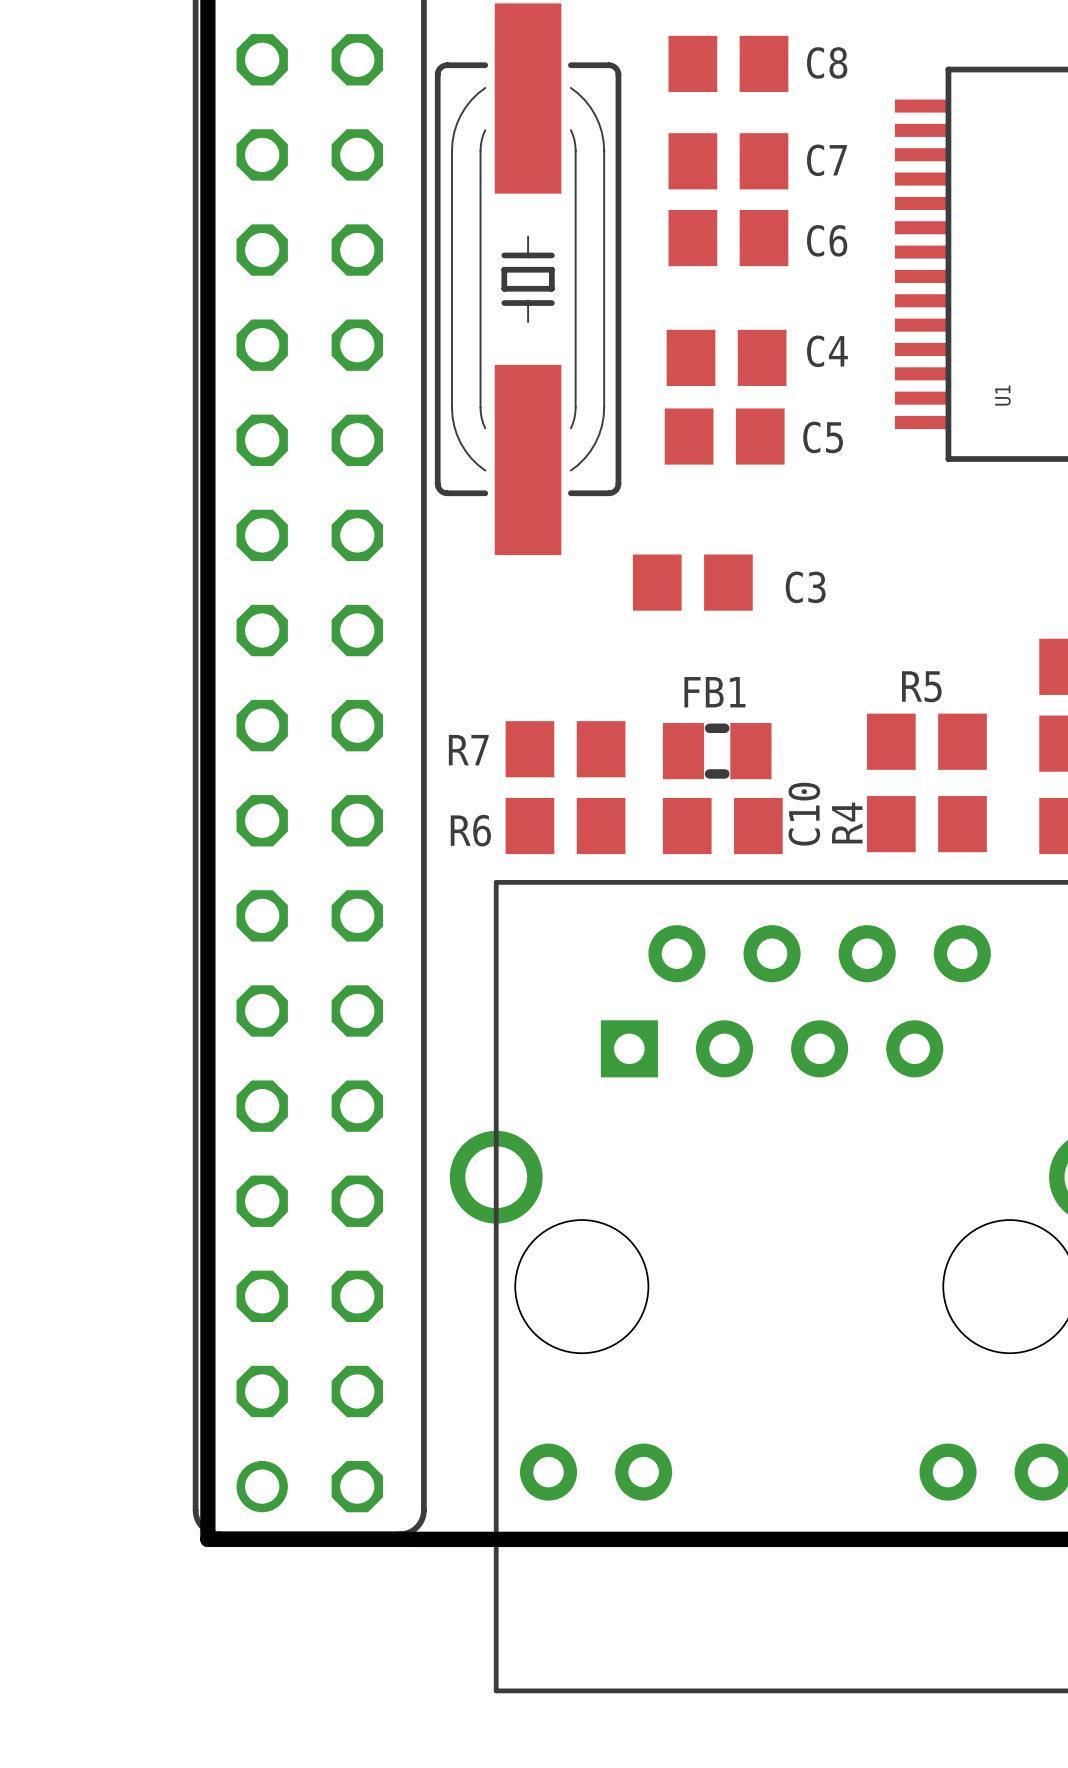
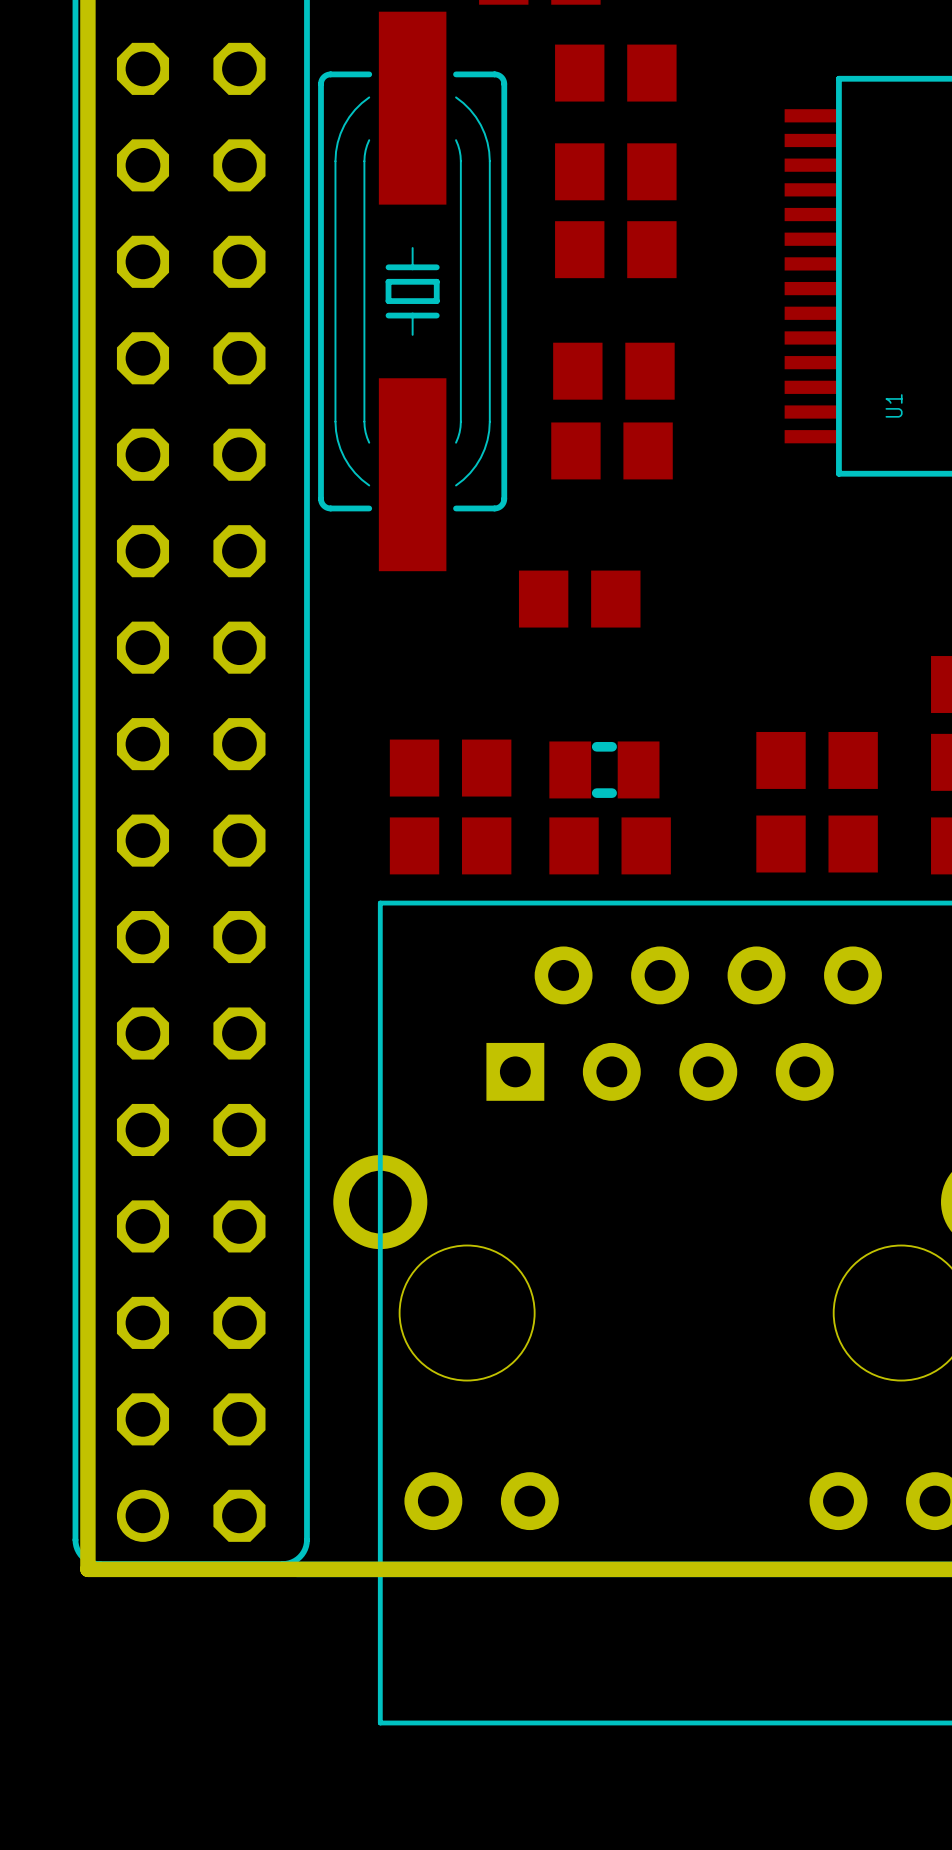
C8 name: C8 (827, 62) -> none
C7 name: C7 (826, 160) -> none
C6 name: C6 (827, 240) -> none
C4 name: C4 (827, 351) -> none
C5 name: C5 (823, 437) -> none
C3 name: C3 (805, 587) -> none
R5 name: R5 (921, 686) -> none
FB1 name: FB1 (714, 692) -> none
R7 name: R7 (468, 750) -> none
C10 name: C10 (804, 814) -> none
R4 name: R4 (847, 823) -> none
R6 name: R6 (470, 830) -> none

